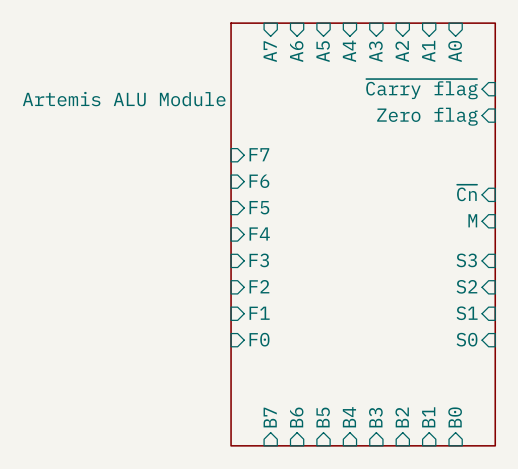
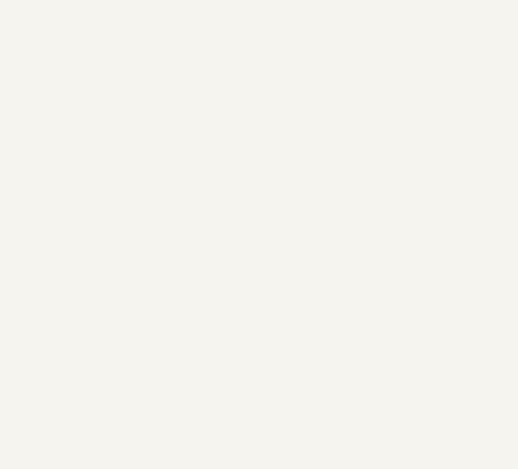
sheet pin: A7 (270, 51) -> none
sheet pin: A6 (296, 51) -> none
sheet pin: A5 (323, 51) -> none
sheet pin: A4 (349, 51) -> none
sheet pin: A3 (375, 51) -> none
sheet pin: A2 (402, 51) -> none
sheet pin: A1 (428, 51) -> none
sheet pin: A0 (455, 51) -> none
sheet pin: ~{Carry flag} (421, 89) -> none
sheet pin: Zero flag (427, 116) -> none
sheet pin: F7 (259, 154) -> none
sheet pin: F6 (259, 181) -> none
sheet pin: ~{Cn} (467, 192) -> none
sheet pin: F5 (259, 207) -> none
sheet pin: M (472, 220) -> none
sheet pin: F4 (259, 233) -> none
sheet Artemis ALU Module: (363, 234) -> none
sheet pin: F3 (259, 260) -> none
sheet pin: S3 (466, 260) -> none
sheet pin: F2 (259, 286) -> none
sheet pin: S2 (466, 286) -> none
sheet pin: F1 (259, 313) -> none
sheet pin: S1 (467, 313) -> none
sheet pin: F0 (259, 339) -> none
sheet pin: S0 (467, 339) -> none
sheet pin: B7 (270, 417) -> none
sheet pin: B6 (296, 417) -> none
sheet pin: B5 (323, 417) -> none
sheet pin: B4 (349, 417) -> none
sheet pin: B3 (375, 417) -> none
sheet pin: B2 (402, 417) -> none
sheet pin: B1 (428, 417) -> none
sheet pin: B0 (455, 417) -> none

